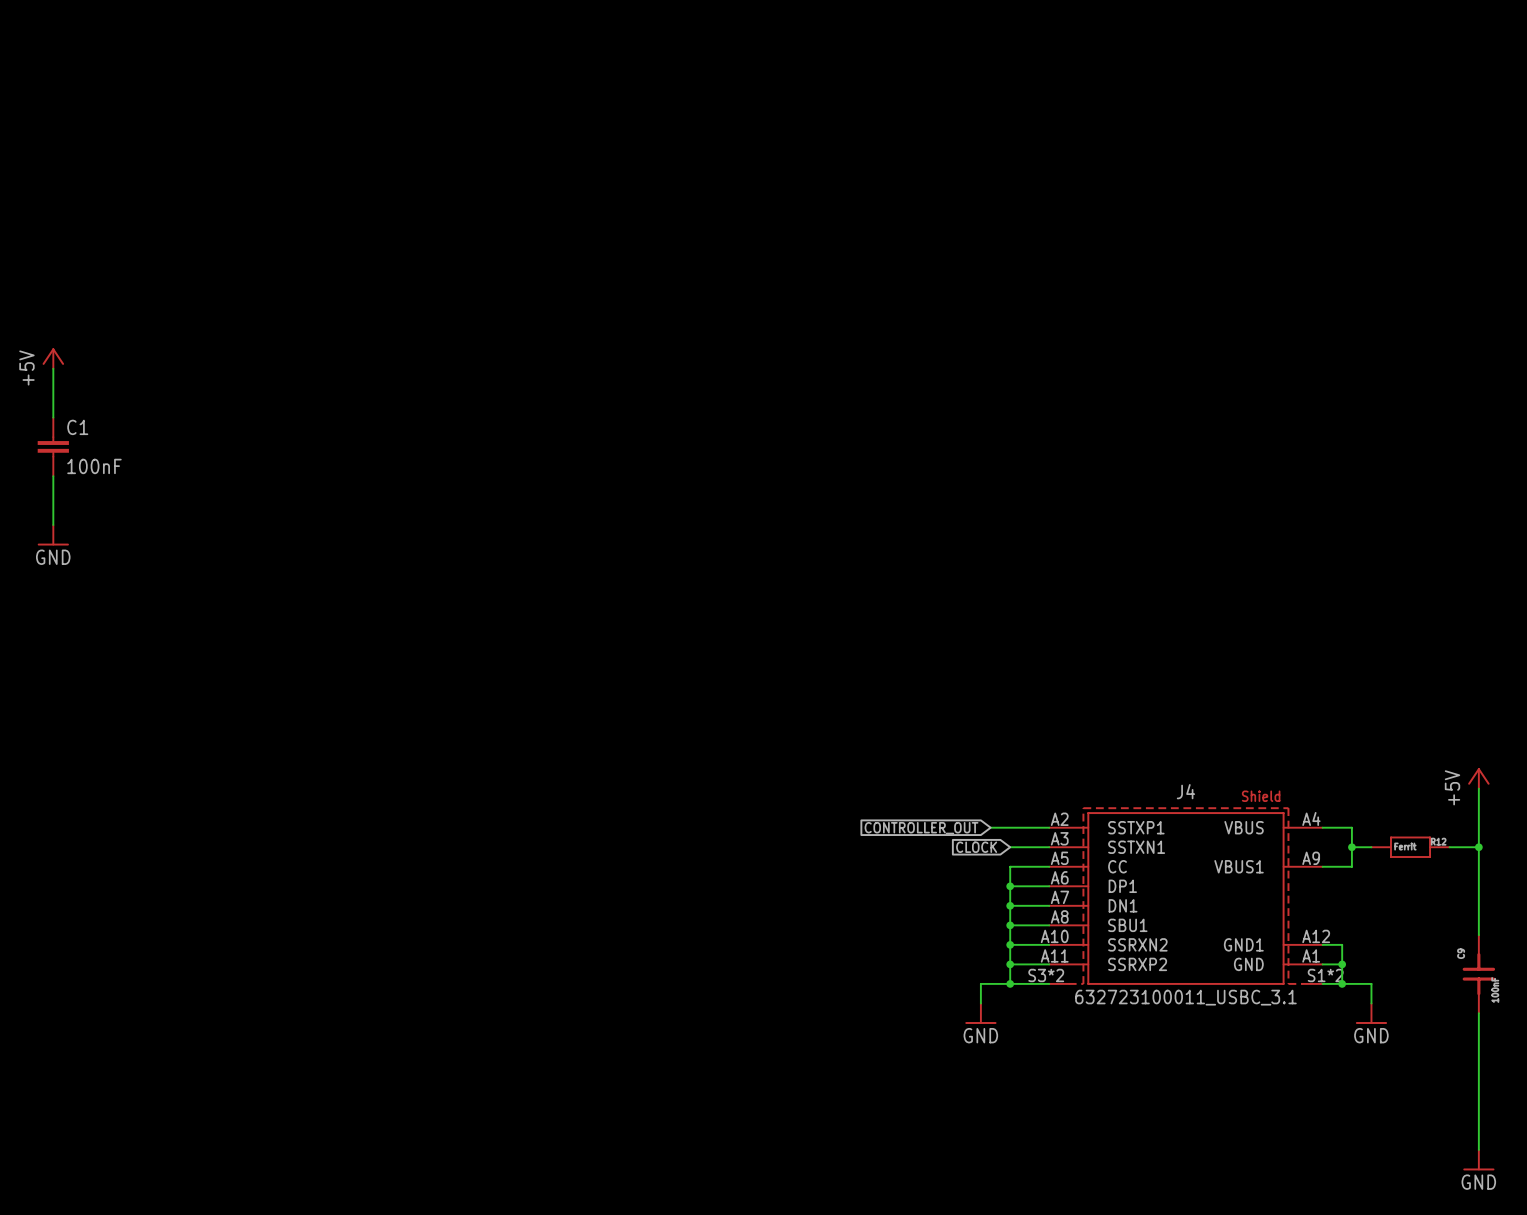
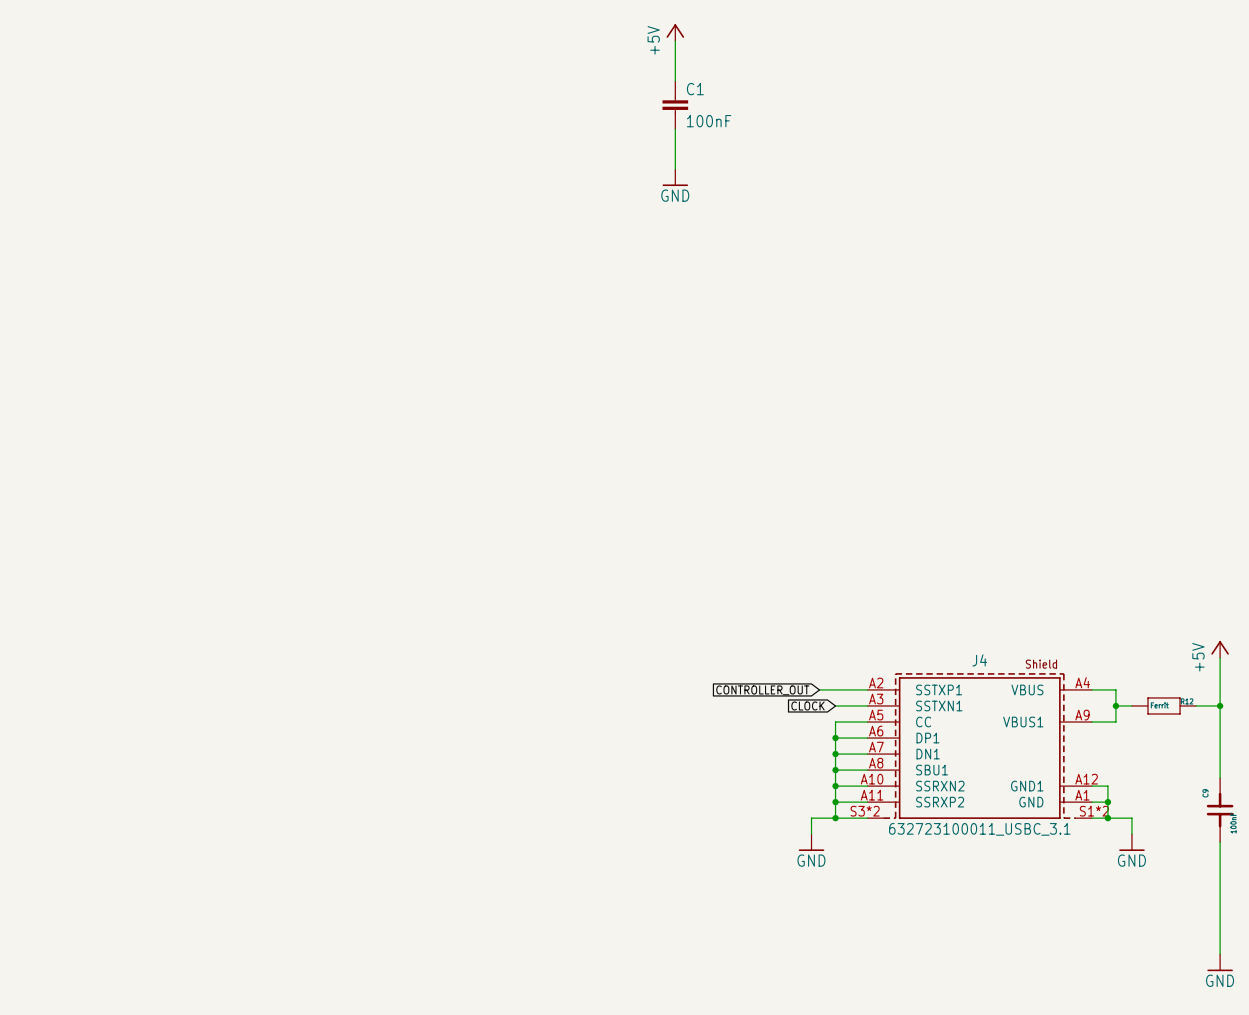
power symbol: none -> +5V (675, 32)
wire: none -> (675, 41) (675, 81)
wire: none -> (675, 129) (675, 169)
power symbol: none -> GND (675, 177)
power symbol: +5V (53, 358) -> none
wire: (53, 368) (53, 417) -> none
C1 position: (53, 446) -> (675, 105)
wire: (53, 476) (53, 525) -> none
power symbol: GND (53, 535) -> none

